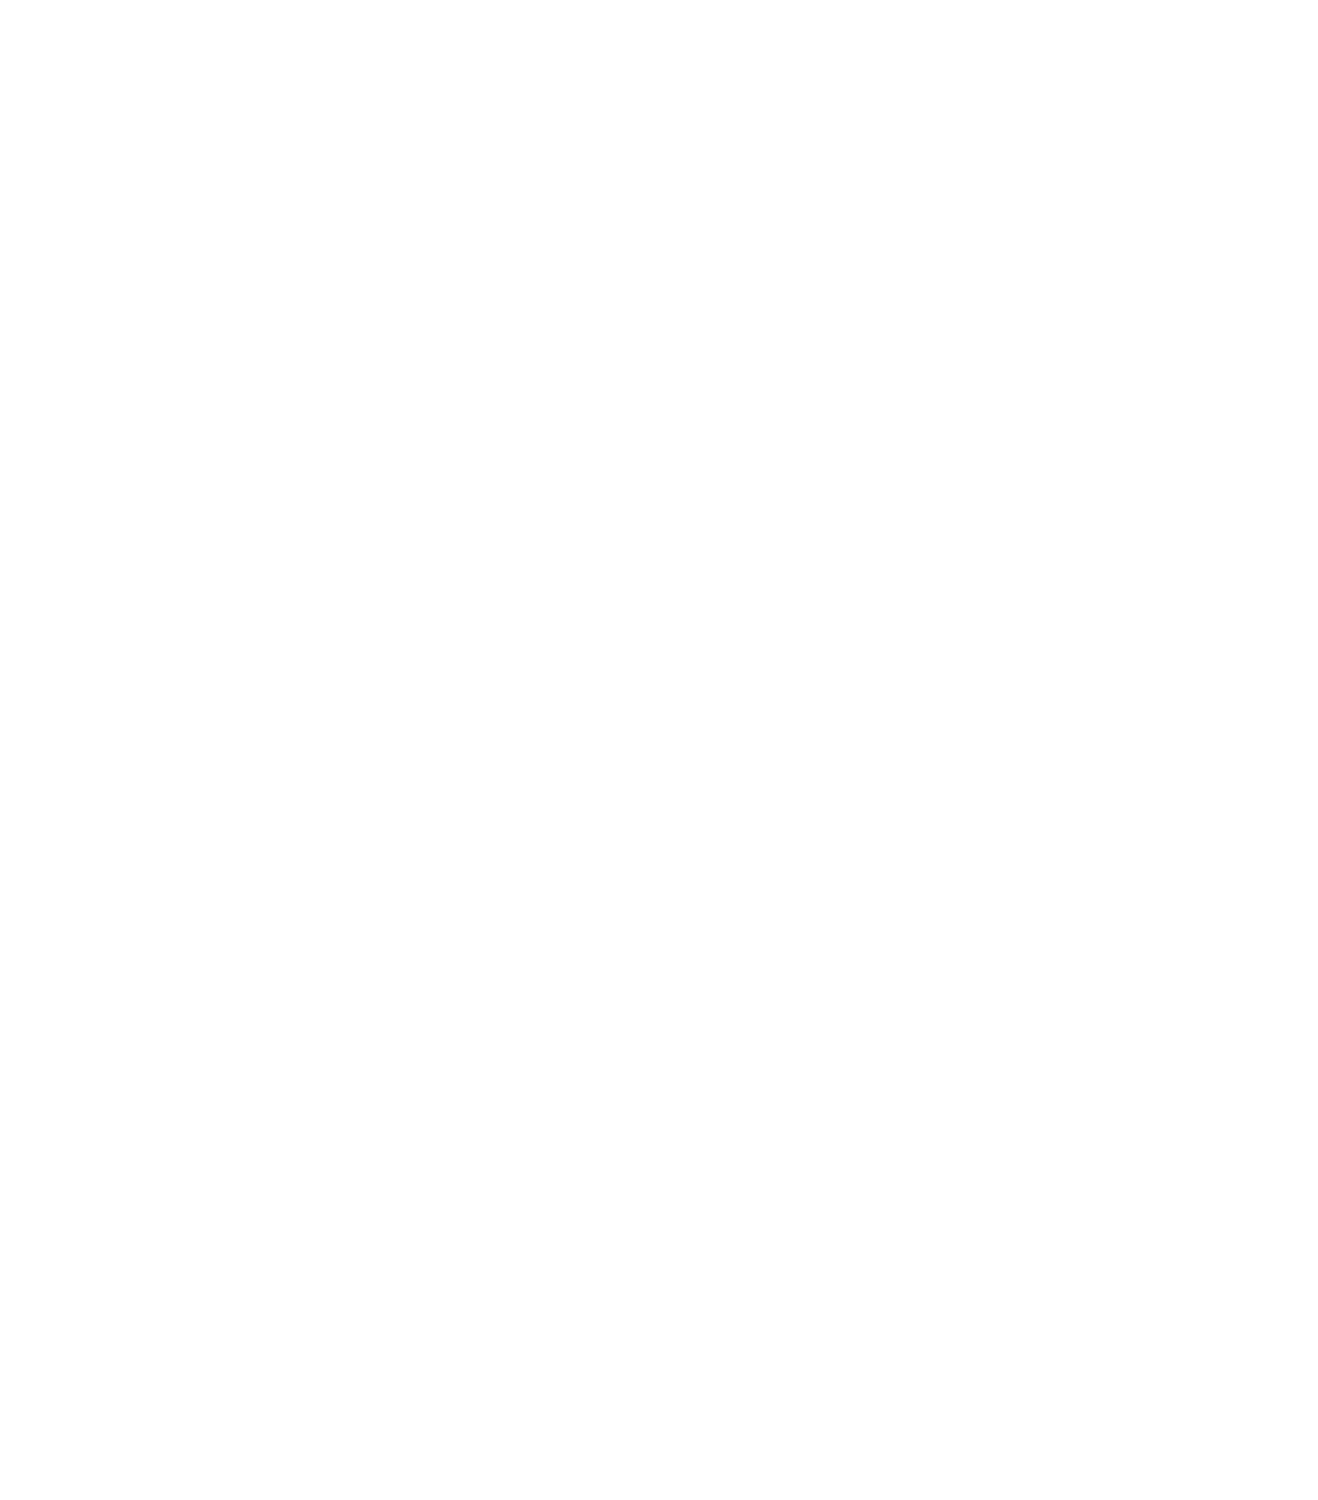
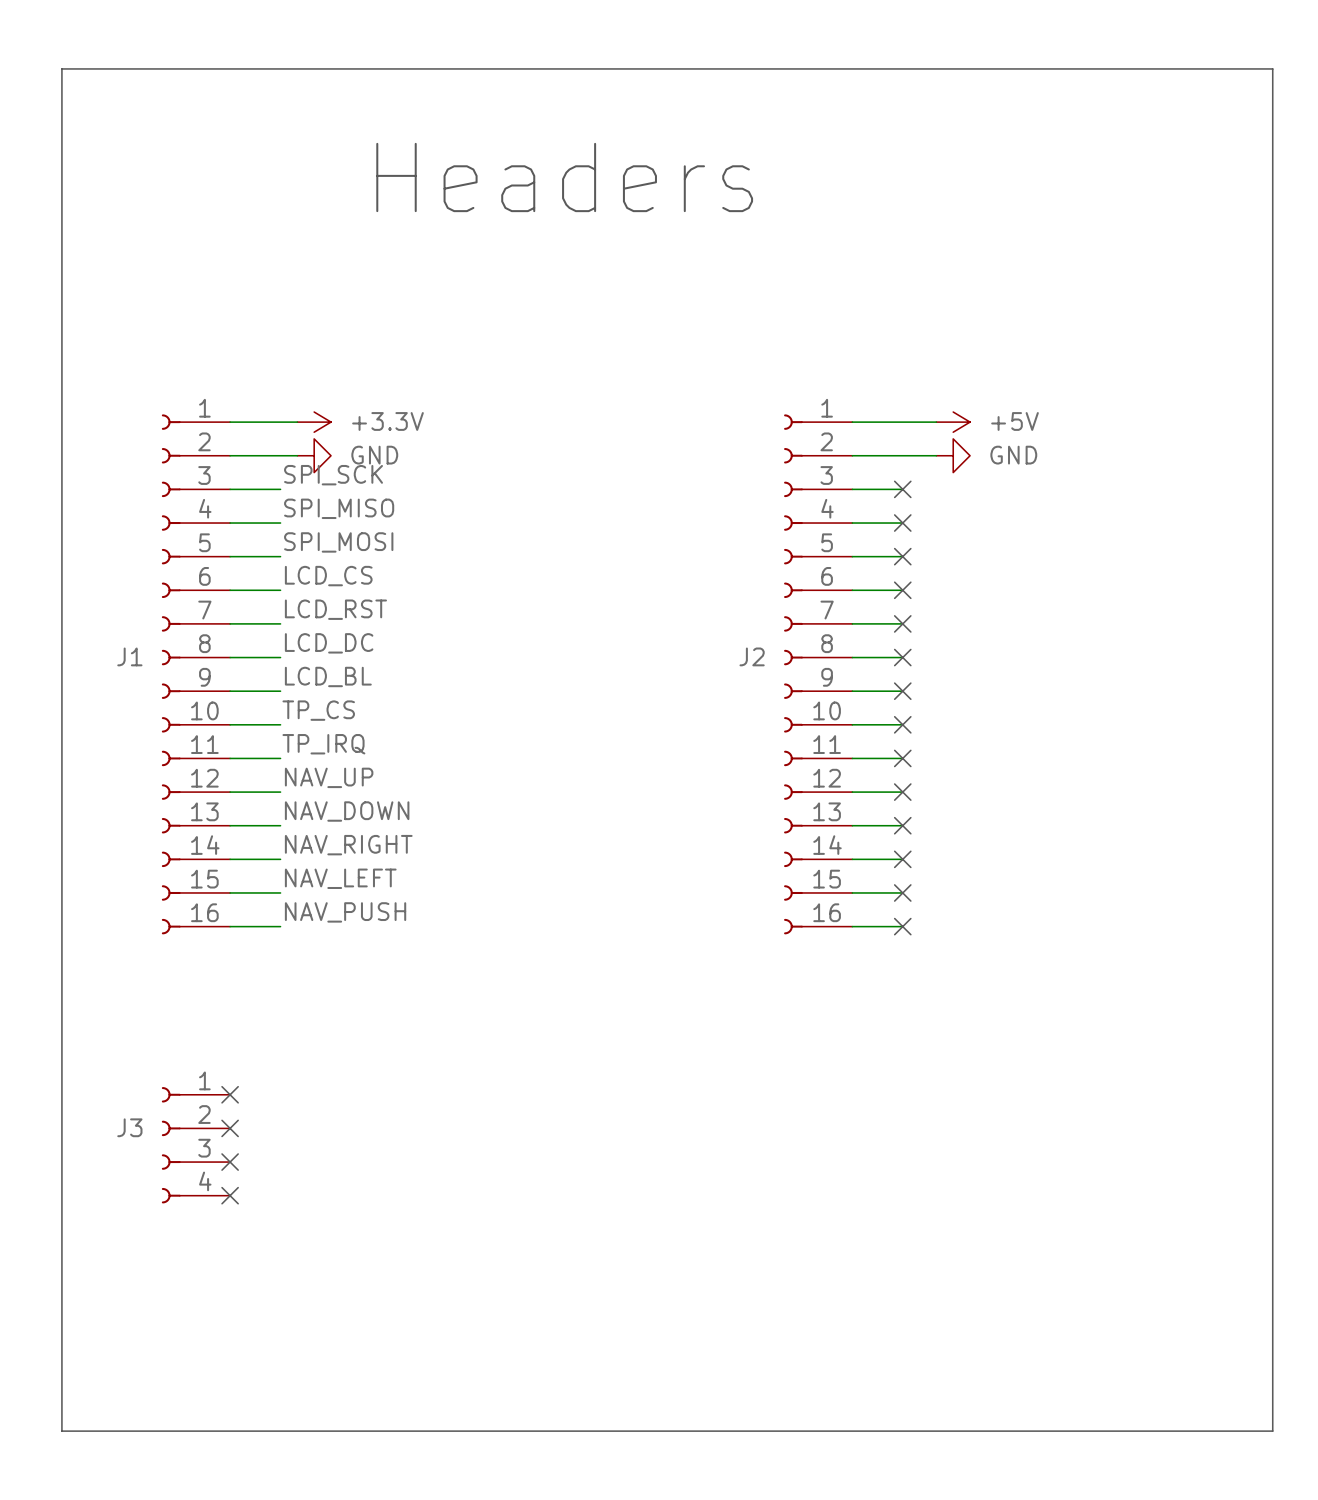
line: none -> (61, 68) (1272, 68) (1272, 1431) (61, 1431) (61, 68)
text: none -> Headers (564, 177)
wire: none -> (230, 422) (297, 422)
power symbol: none -> +3.3V (314, 422)
wire: none -> (852, 422) (936, 422)
power symbol: none -> +5V (953, 422)
wire: none -> (230, 455) (297, 455)
power symbol: none -> GND (314, 455)
wire: none -> (852, 455) (936, 455)
power symbol: none -> GND (953, 455)
label: none -> SPI_SCK (333, 475)
wire: none -> (230, 489) (280, 489)
wire: none -> (852, 489) (902, 489)
no-connect mark: none -> (902, 489)
label: none -> SPI_MISO (339, 508)
wire: none -> (230, 523) (280, 523)
wire: none -> (852, 523) (902, 523)
no-connect mark: none -> (902, 523)
label: none -> SPI_MOSI (338, 542)
wire: none -> (230, 556) (280, 556)
wire: none -> (852, 556) (902, 556)
no-connect mark: none -> (902, 556)
label: none -> LCD_CS (328, 576)
wire: none -> (230, 590) (280, 590)
wire: none -> (852, 590) (902, 590)
no-connect mark: none -> (902, 590)
label: none -> LCD_RST (335, 609)
wire: none -> (230, 623) (280, 623)
wire: none -> (852, 623) (902, 623)
no-connect mark: none -> (902, 623)
label: none -> LCD_DC (329, 643)
wire: none -> (230, 657) (280, 657)
wire: none -> (852, 657) (902, 657)
no-connect mark: none -> (902, 657)
J1: none -> (195, 674)
J2: none -> (818, 674)
label: none -> LCD_BL (328, 676)
wire: none -> (230, 691) (280, 691)
wire: none -> (852, 691) (902, 691)
no-connect mark: none -> (902, 691)
label: none -> TP_CS (318, 710)
wire: none -> (230, 724) (280, 724)
wire: none -> (852, 724) (902, 724)
no-connect mark: none -> (902, 724)
label: none -> TP_IRQ (323, 744)
wire: none -> (230, 758) (280, 758)
wire: none -> (852, 758) (902, 758)
no-connect mark: none -> (902, 758)
label: none -> NAV_UP (329, 777)
wire: none -> (230, 792) (280, 792)
wire: none -> (852, 792) (902, 792)
no-connect mark: none -> (902, 792)
label: none -> NAV_DOWN (347, 811)
wire: none -> (230, 825) (280, 825)
wire: none -> (852, 825) (902, 825)
no-connect mark: none -> (902, 825)
label: none -> NAV_RIGHT (348, 845)
wire: none -> (230, 859) (280, 859)
wire: none -> (852, 859) (902, 859)
no-connect mark: none -> (902, 859)
label: none -> NAV_LEFT (340, 878)
wire: none -> (230, 892) (280, 892)
wire: none -> (852, 892) (902, 892)
no-connect mark: none -> (902, 892)
label: none -> NAV_PUSH (345, 912)
wire: none -> (230, 926) (280, 926)
wire: none -> (852, 926) (902, 926)
no-connect mark: none -> (902, 926)
no-connect mark: none -> (230, 1094)
no-connect mark: none -> (230, 1128)
J3: none -> (195, 1145)
no-connect mark: none -> (230, 1162)
no-connect mark: none -> (230, 1195)

